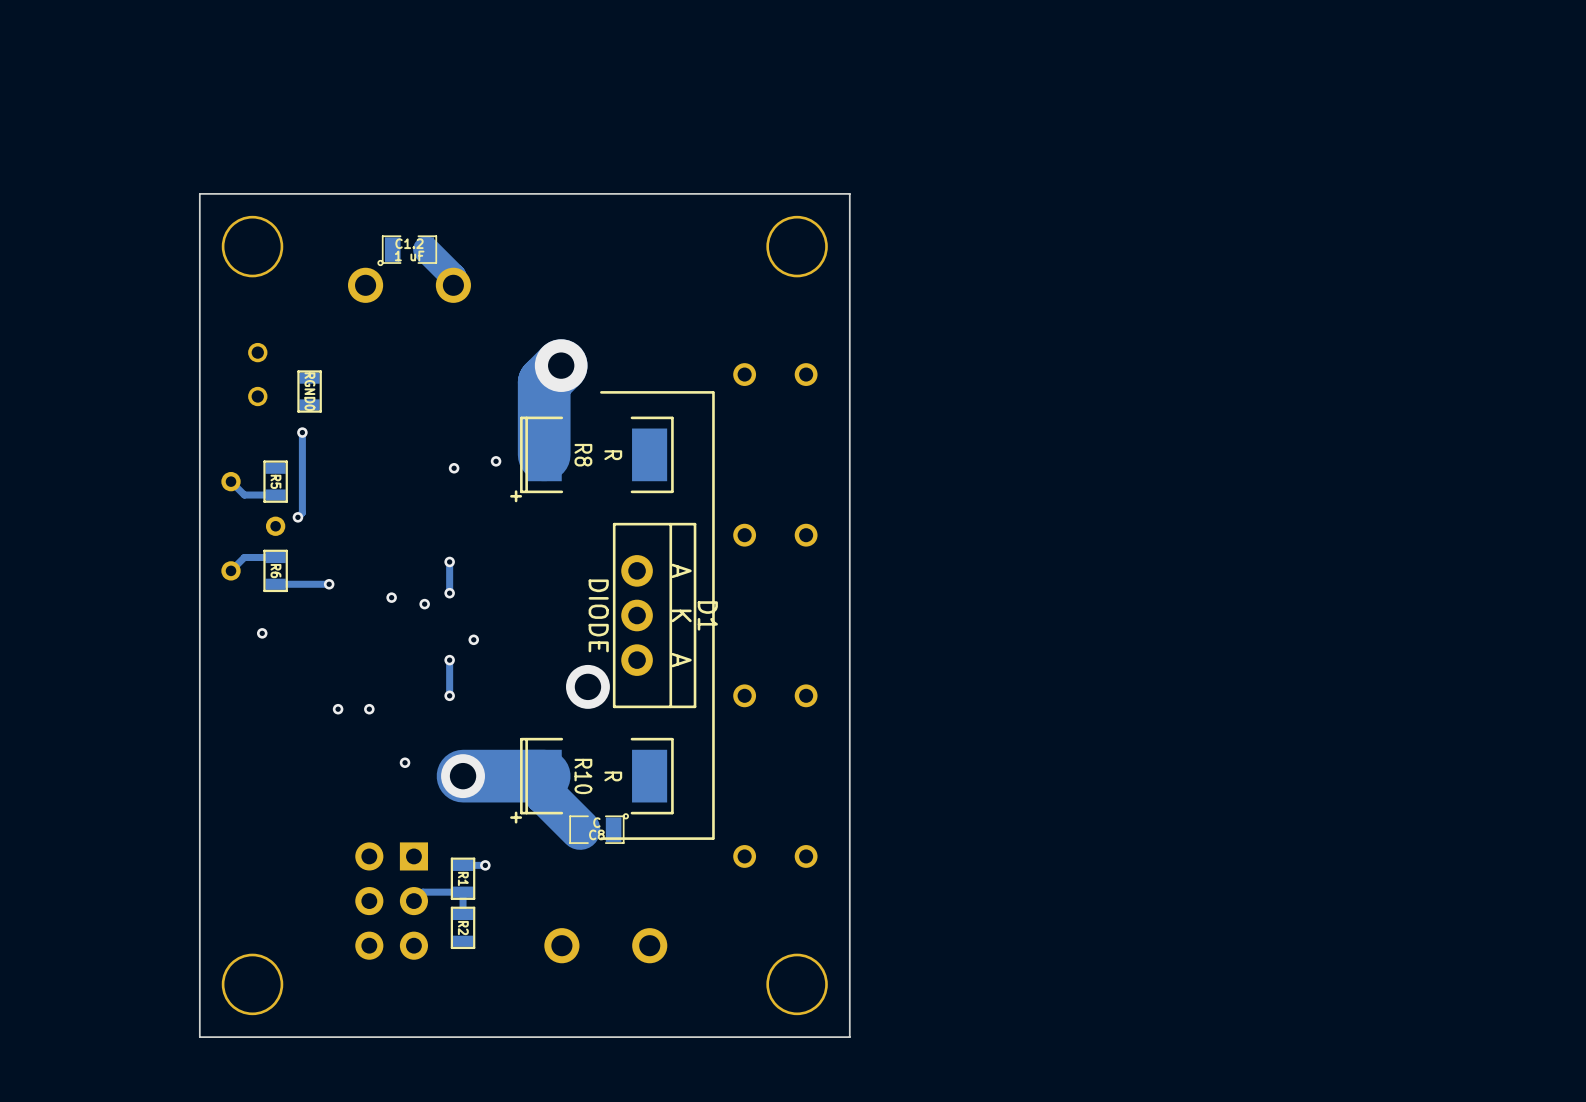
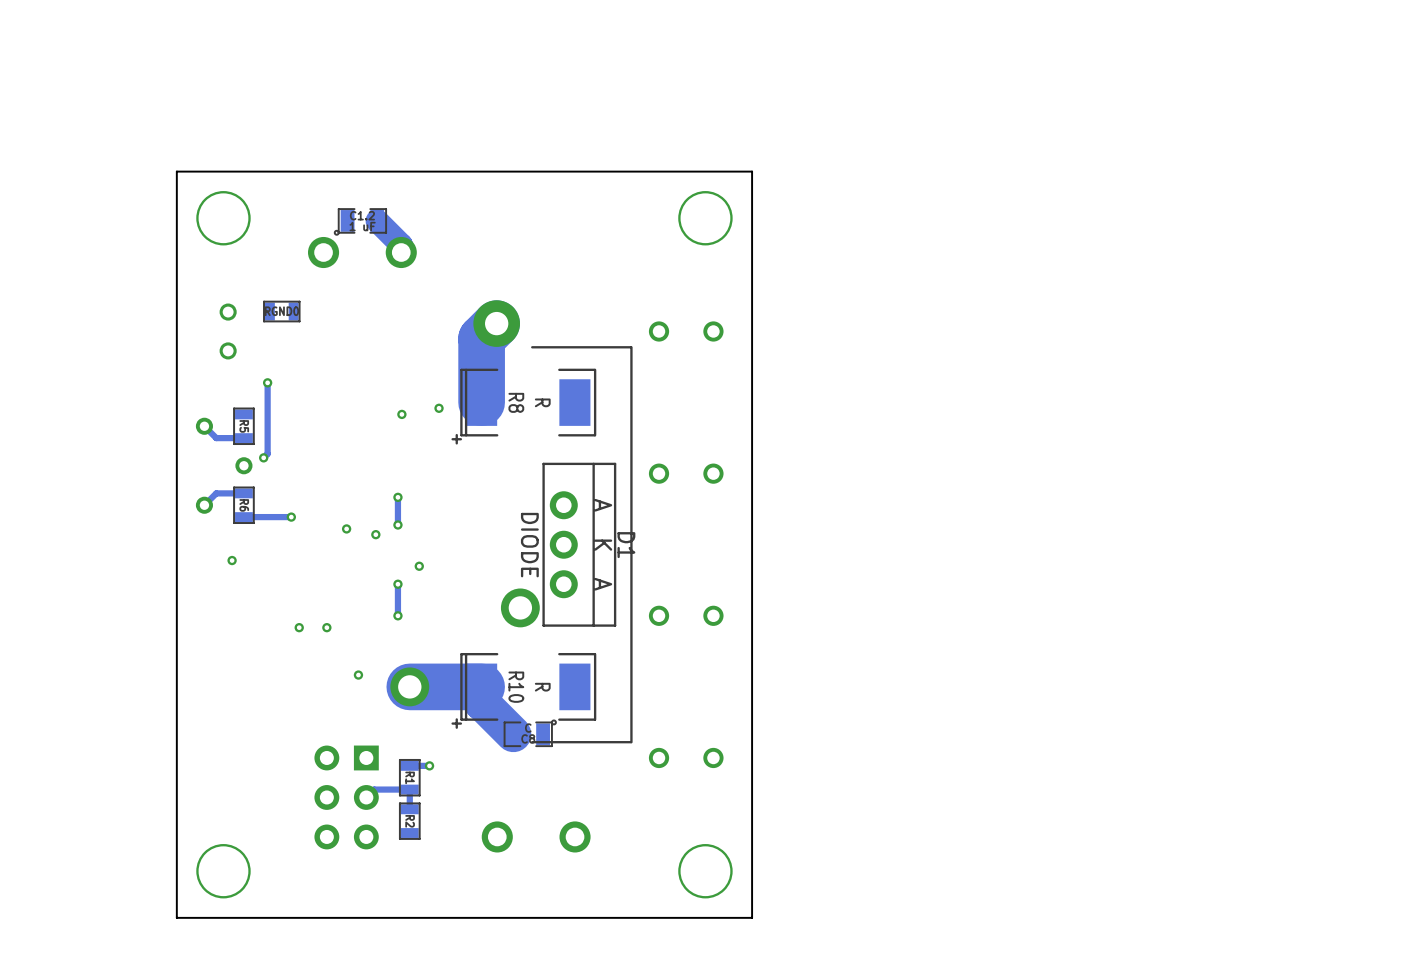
RGND0 rotation: 0° (309, 391) -> 90° clockwise (281, 311)
RGND0 position: (309, 391) -> (281, 311)

